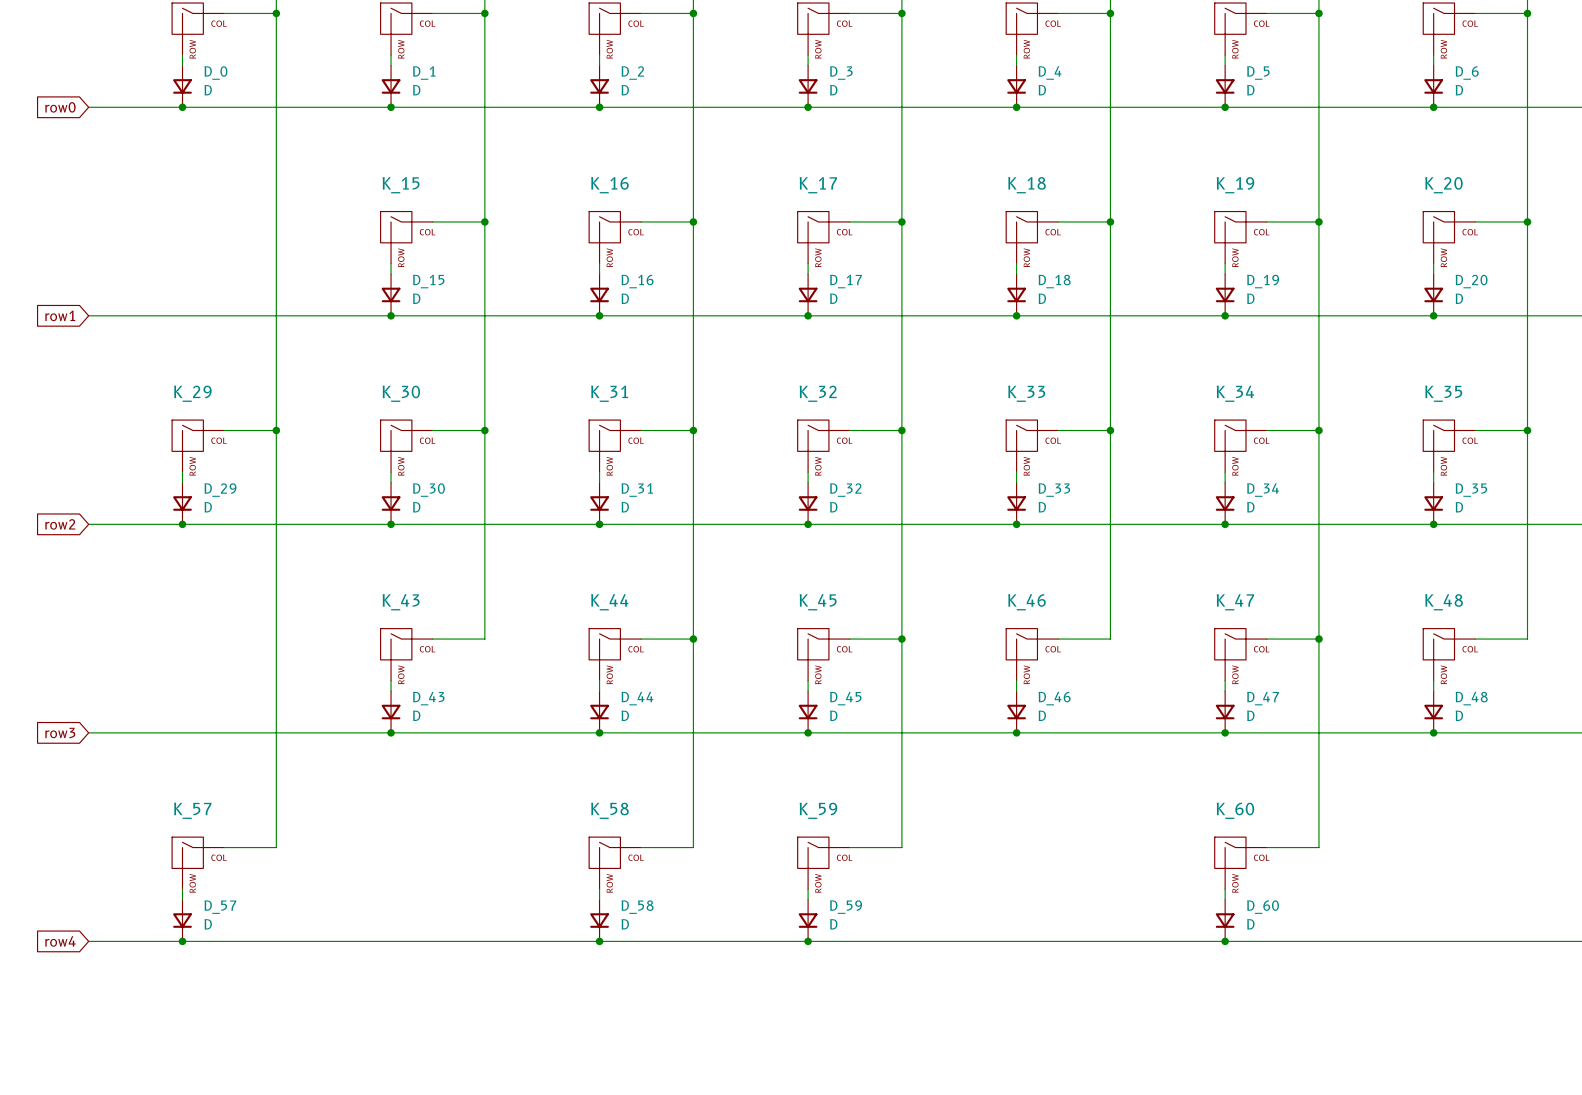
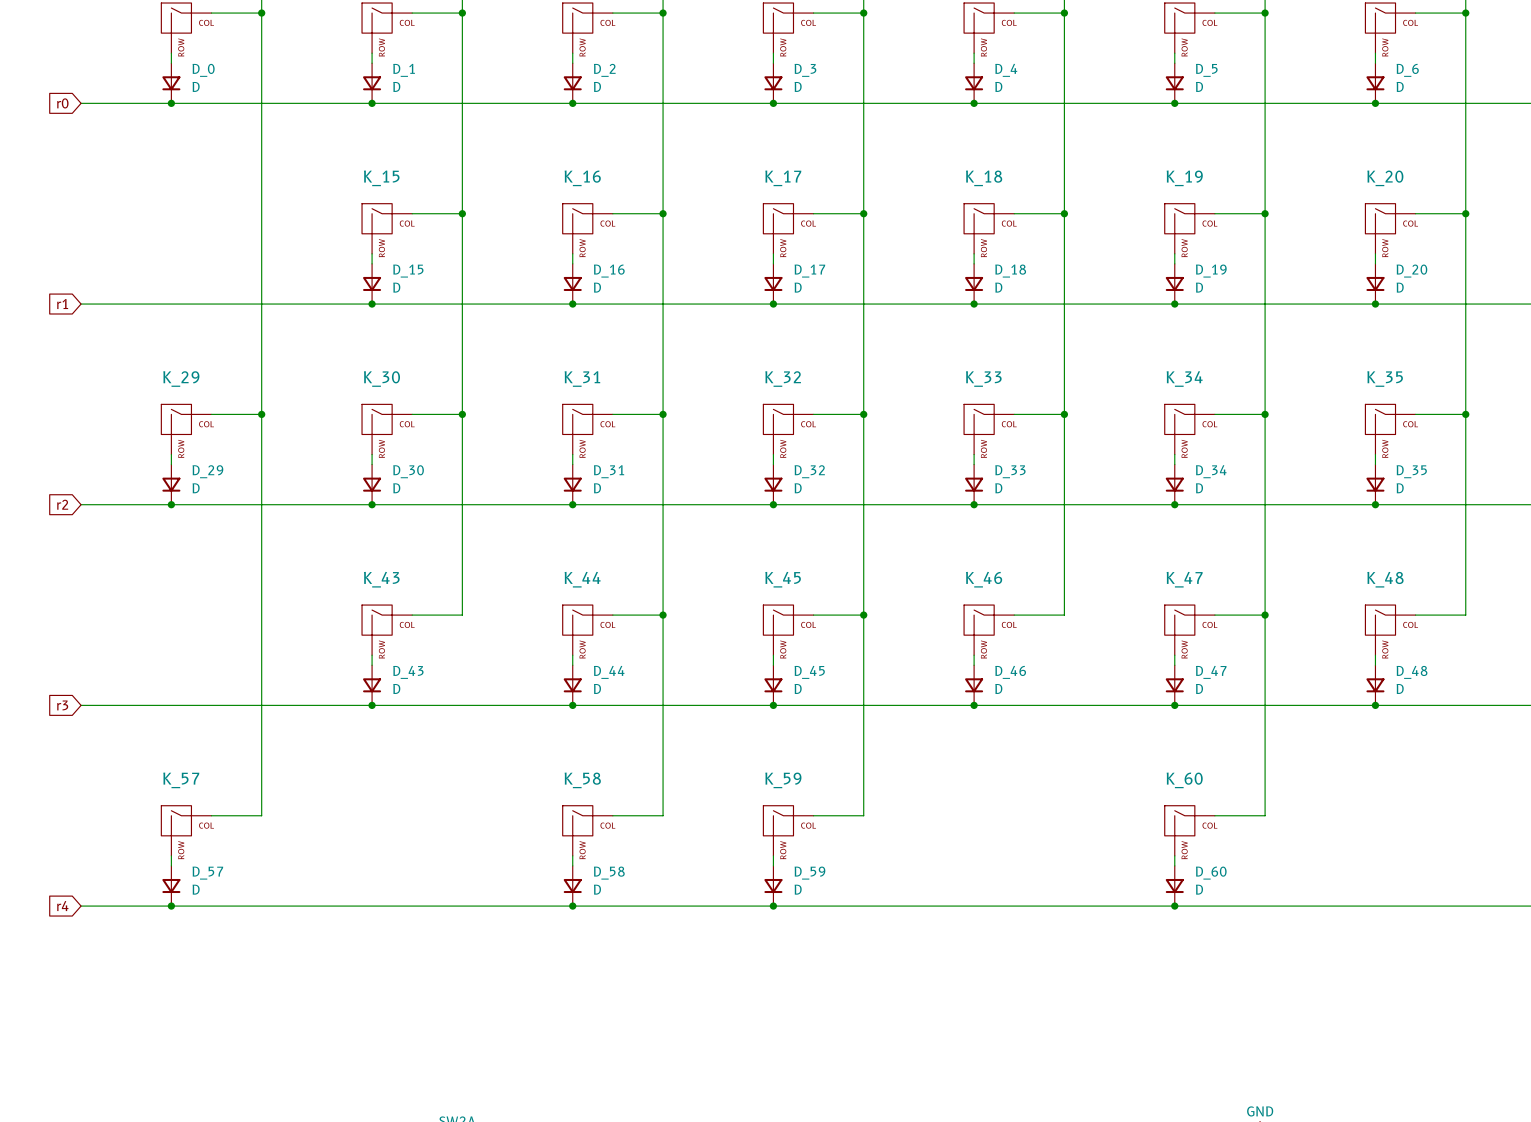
global label: row0 (60, 107) -> r0 (62, 103)
global label: row1 (60, 315) -> r1 (62, 304)
global label: row2 (60, 524) -> r2 (62, 504)
global label: row3 (60, 732) -> r3 (62, 705)
global label: row4 (60, 941) -> r4 (62, 906)

